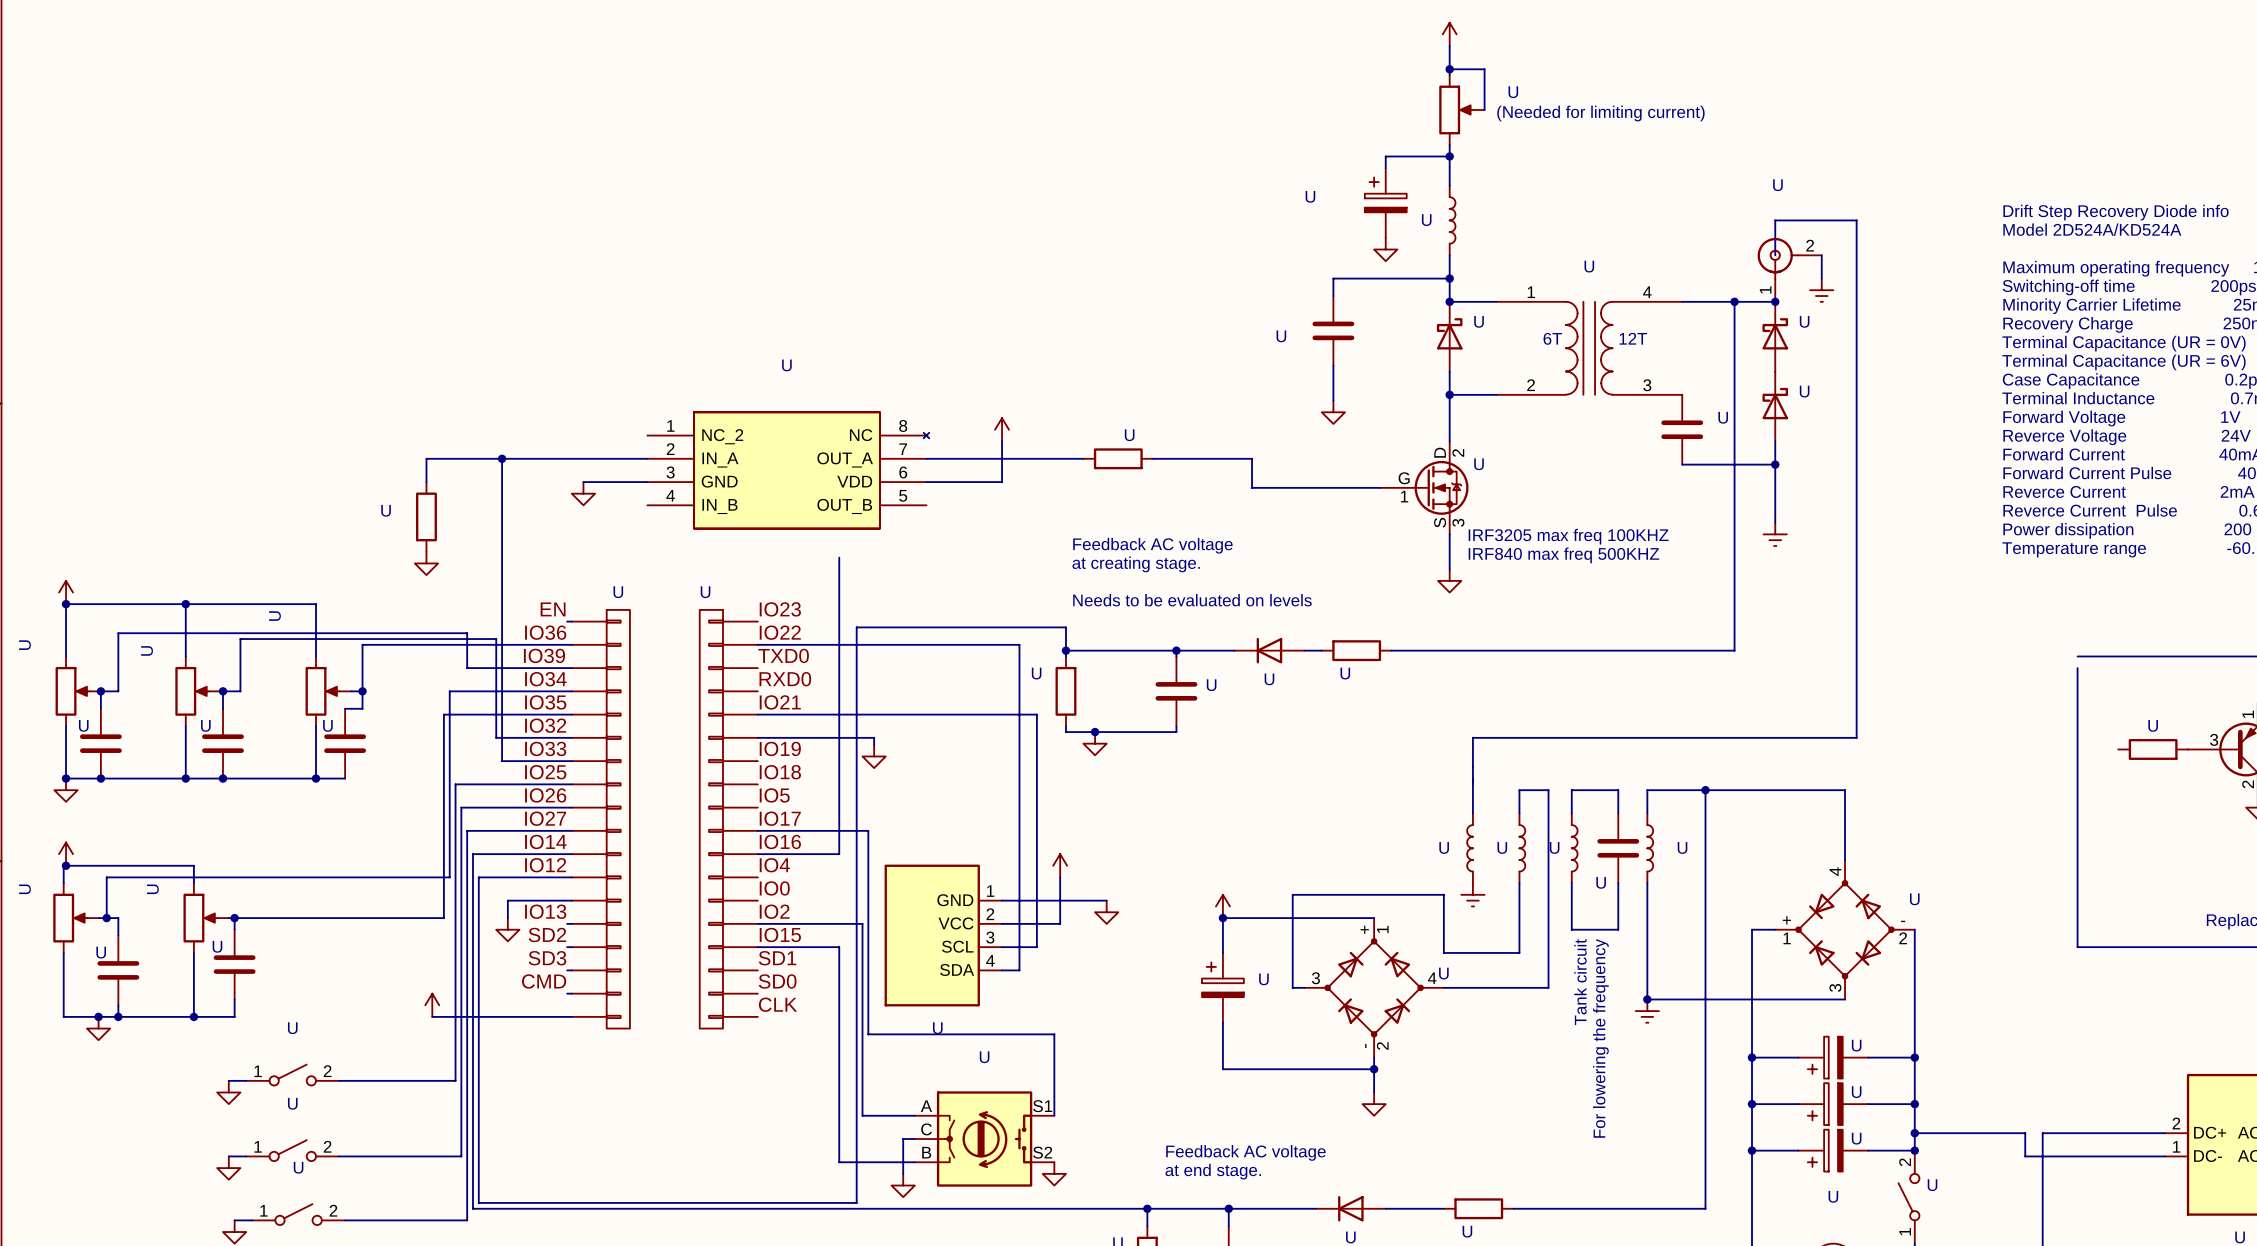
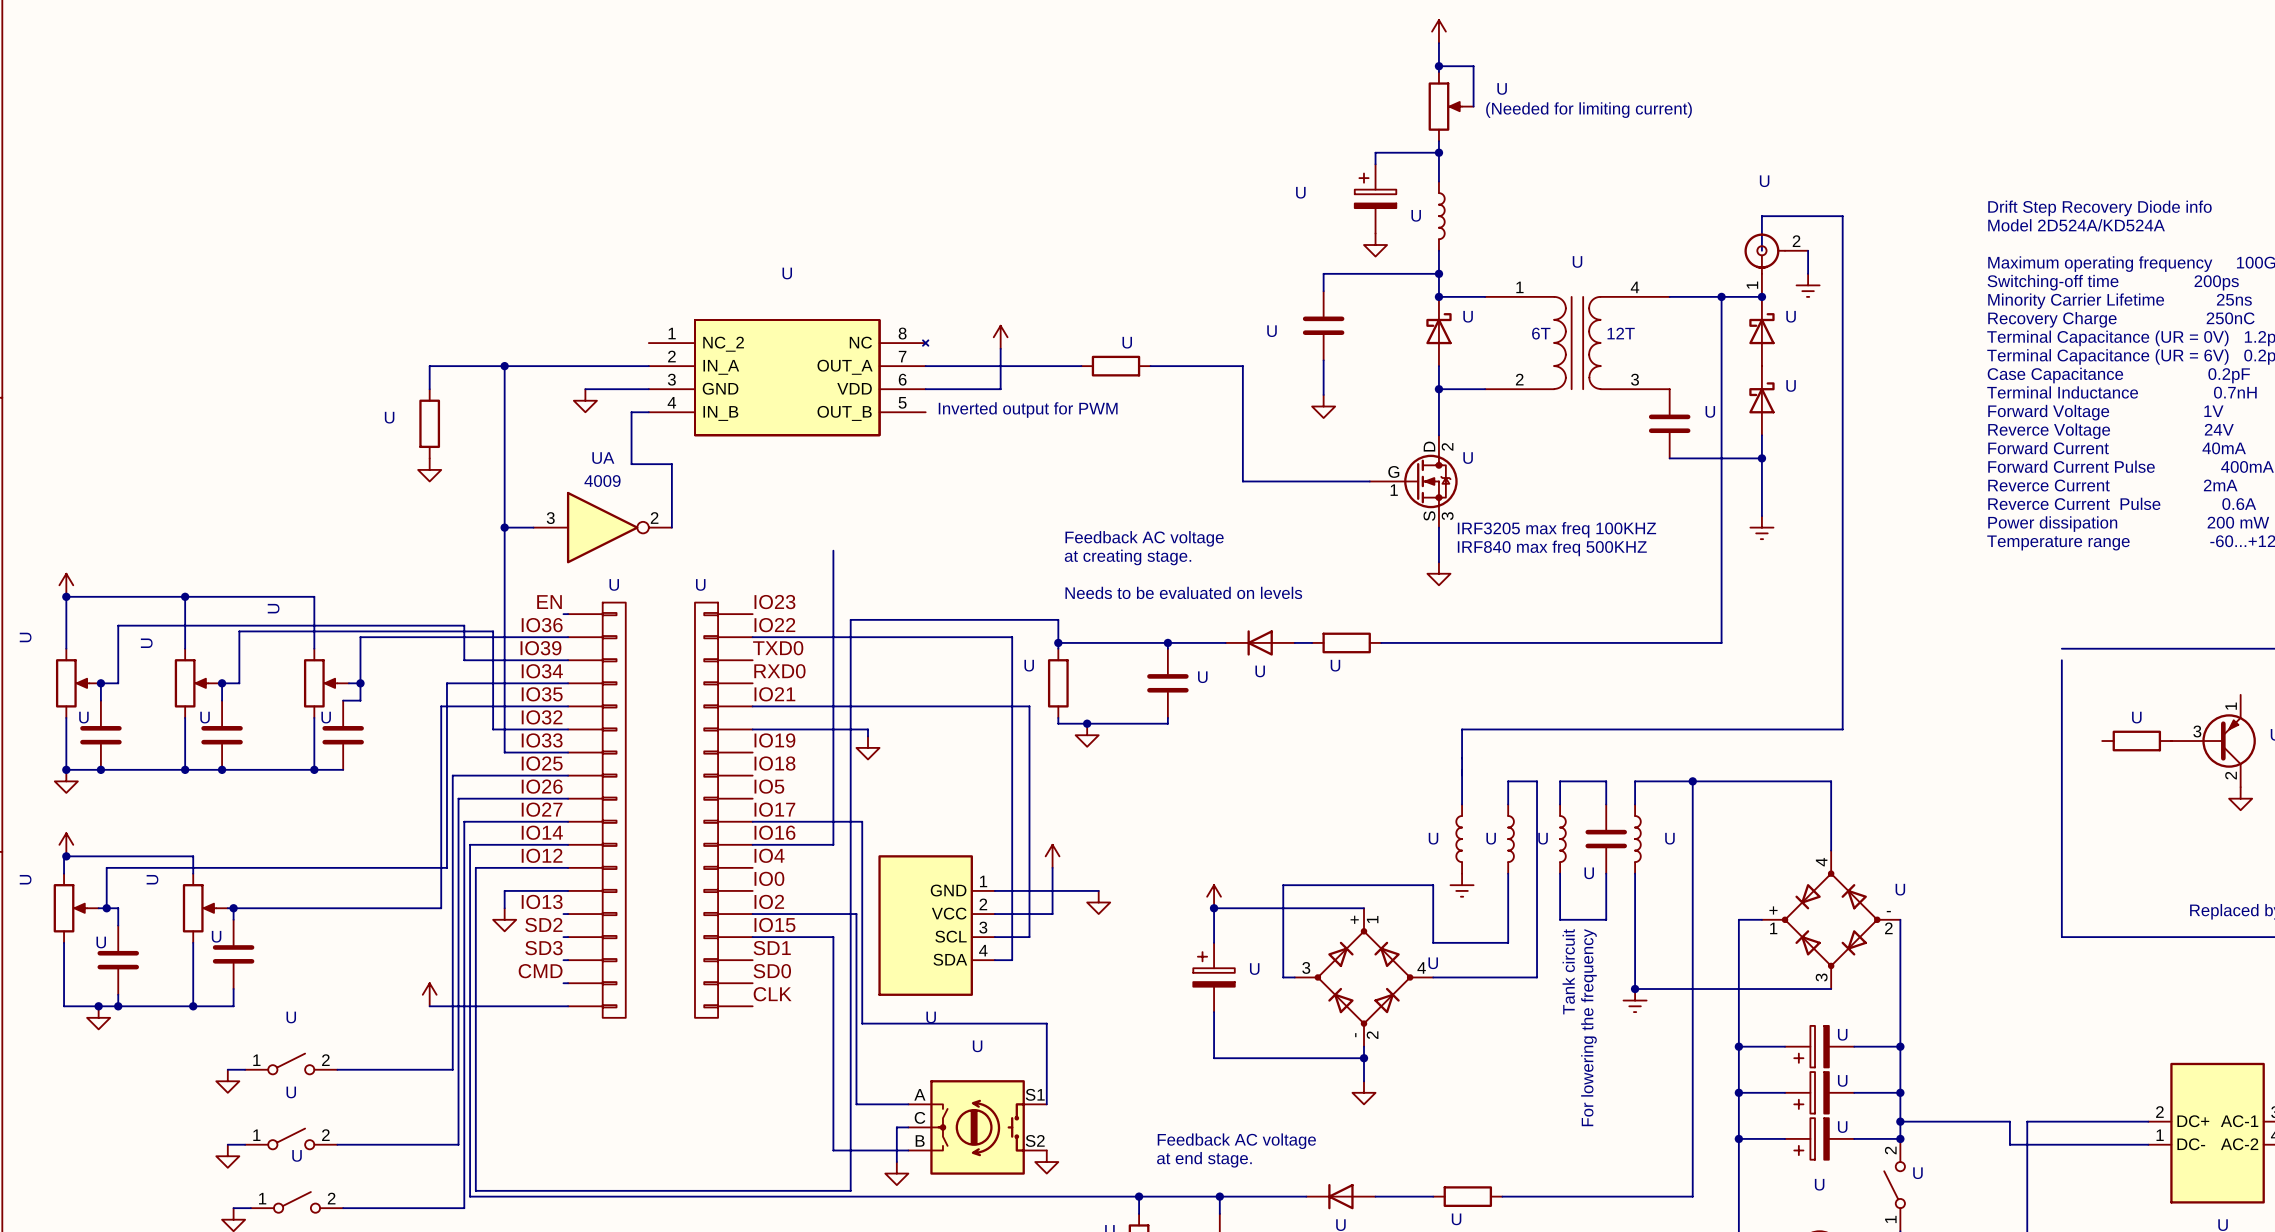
junction: none -> (504, 366)
power symbol: none -> (585, 400)
text: none -> Inverted output for PWM (1028, 410)
wire: none -> (648, 412) (631, 412) (631, 464) (671, 464) (671, 527)
power symbol position: (1002, 429) -> (1000, 337)
wire: (1002, 441) (1002, 482) (926, 482) -> (1000, 348) (1000, 389) (925, 389)
wire: (502, 458) (502, 761) (507, 761) -> (504, 366) (504, 752)
junction: (502, 458) -> none
wire: (647, 458) (426, 458) (426, 482) -> (648, 366) (429, 366) (429, 389)
wire: (926, 458) (1083, 458) -> (925, 366) (1081, 366)
U position: (1118, 458) -> (1116, 366)
wire: (1153, 458) (1252, 458) -> (1150, 366) (1242, 366) (1242, 452)
U position: (788, 470) -> (788, 377)
power symbol: none -> (429, 469)
wire: (583, 482) (647, 482) -> (585, 389) (648, 389)
power symbol: (583, 493) -> none
U position: (426, 516) -> (429, 423)
wire: none -> (504, 527) (533, 527)
junction: none -> (504, 527)
UA: none -> 4009 (602, 527)
power symbol: (426, 563) -> none

